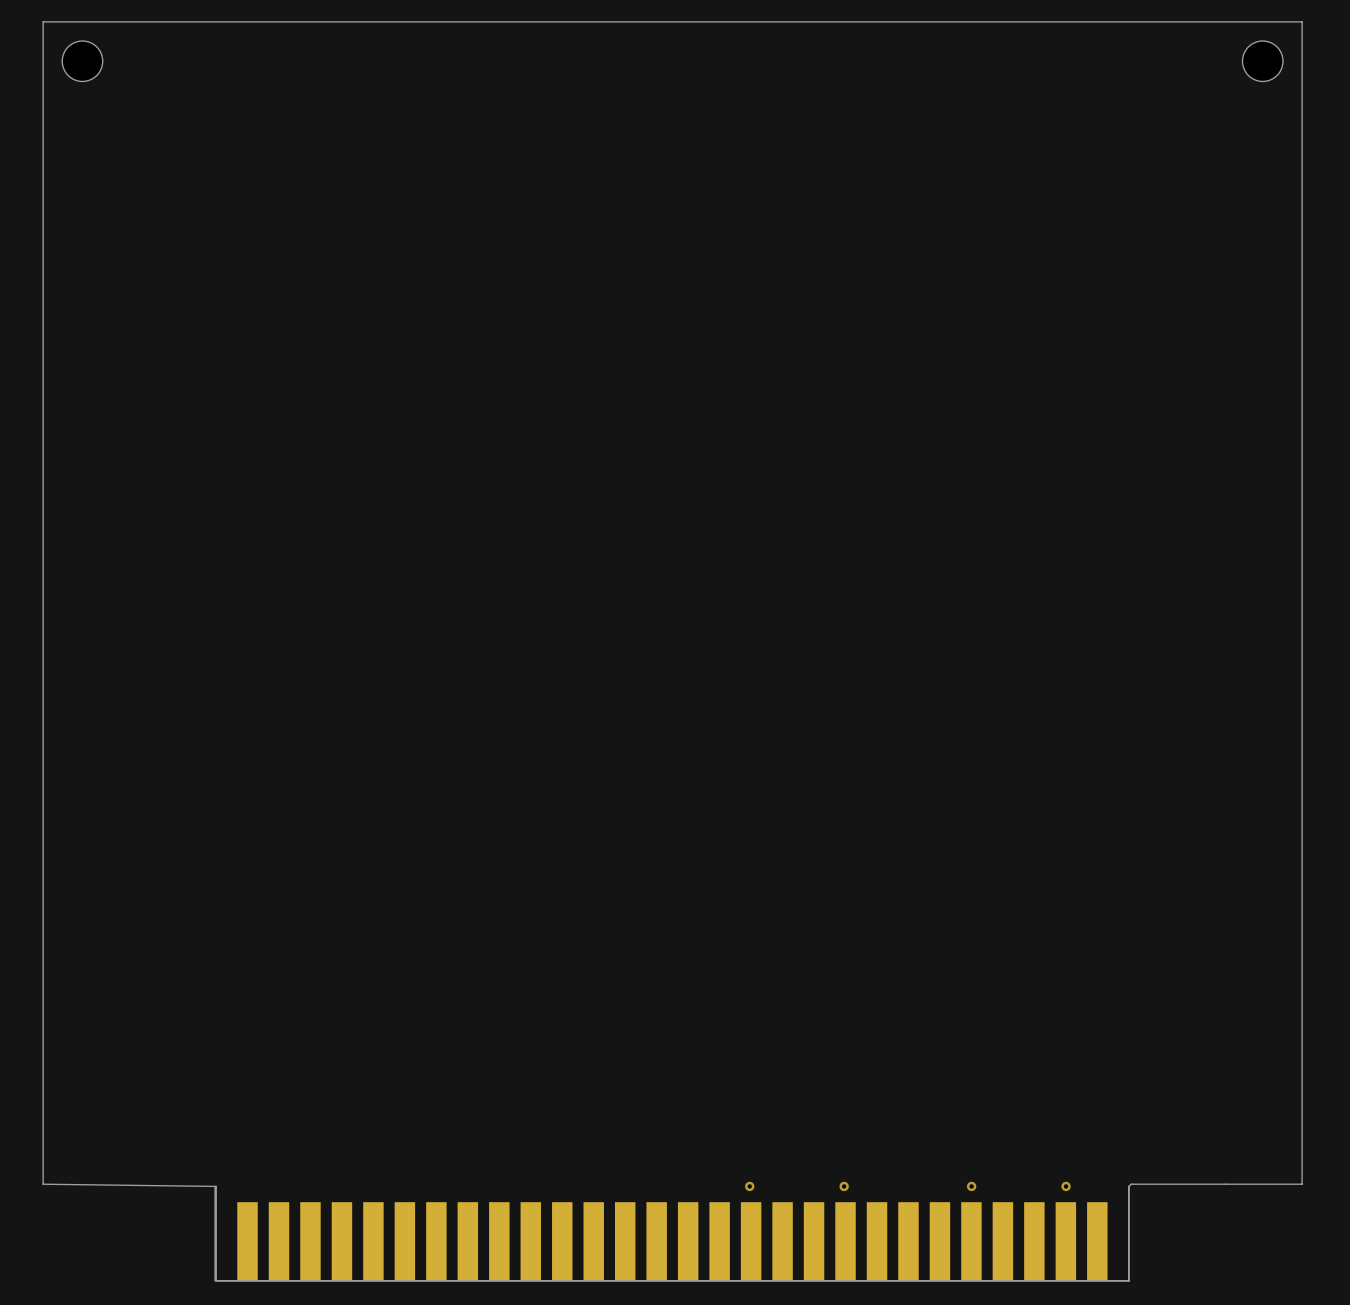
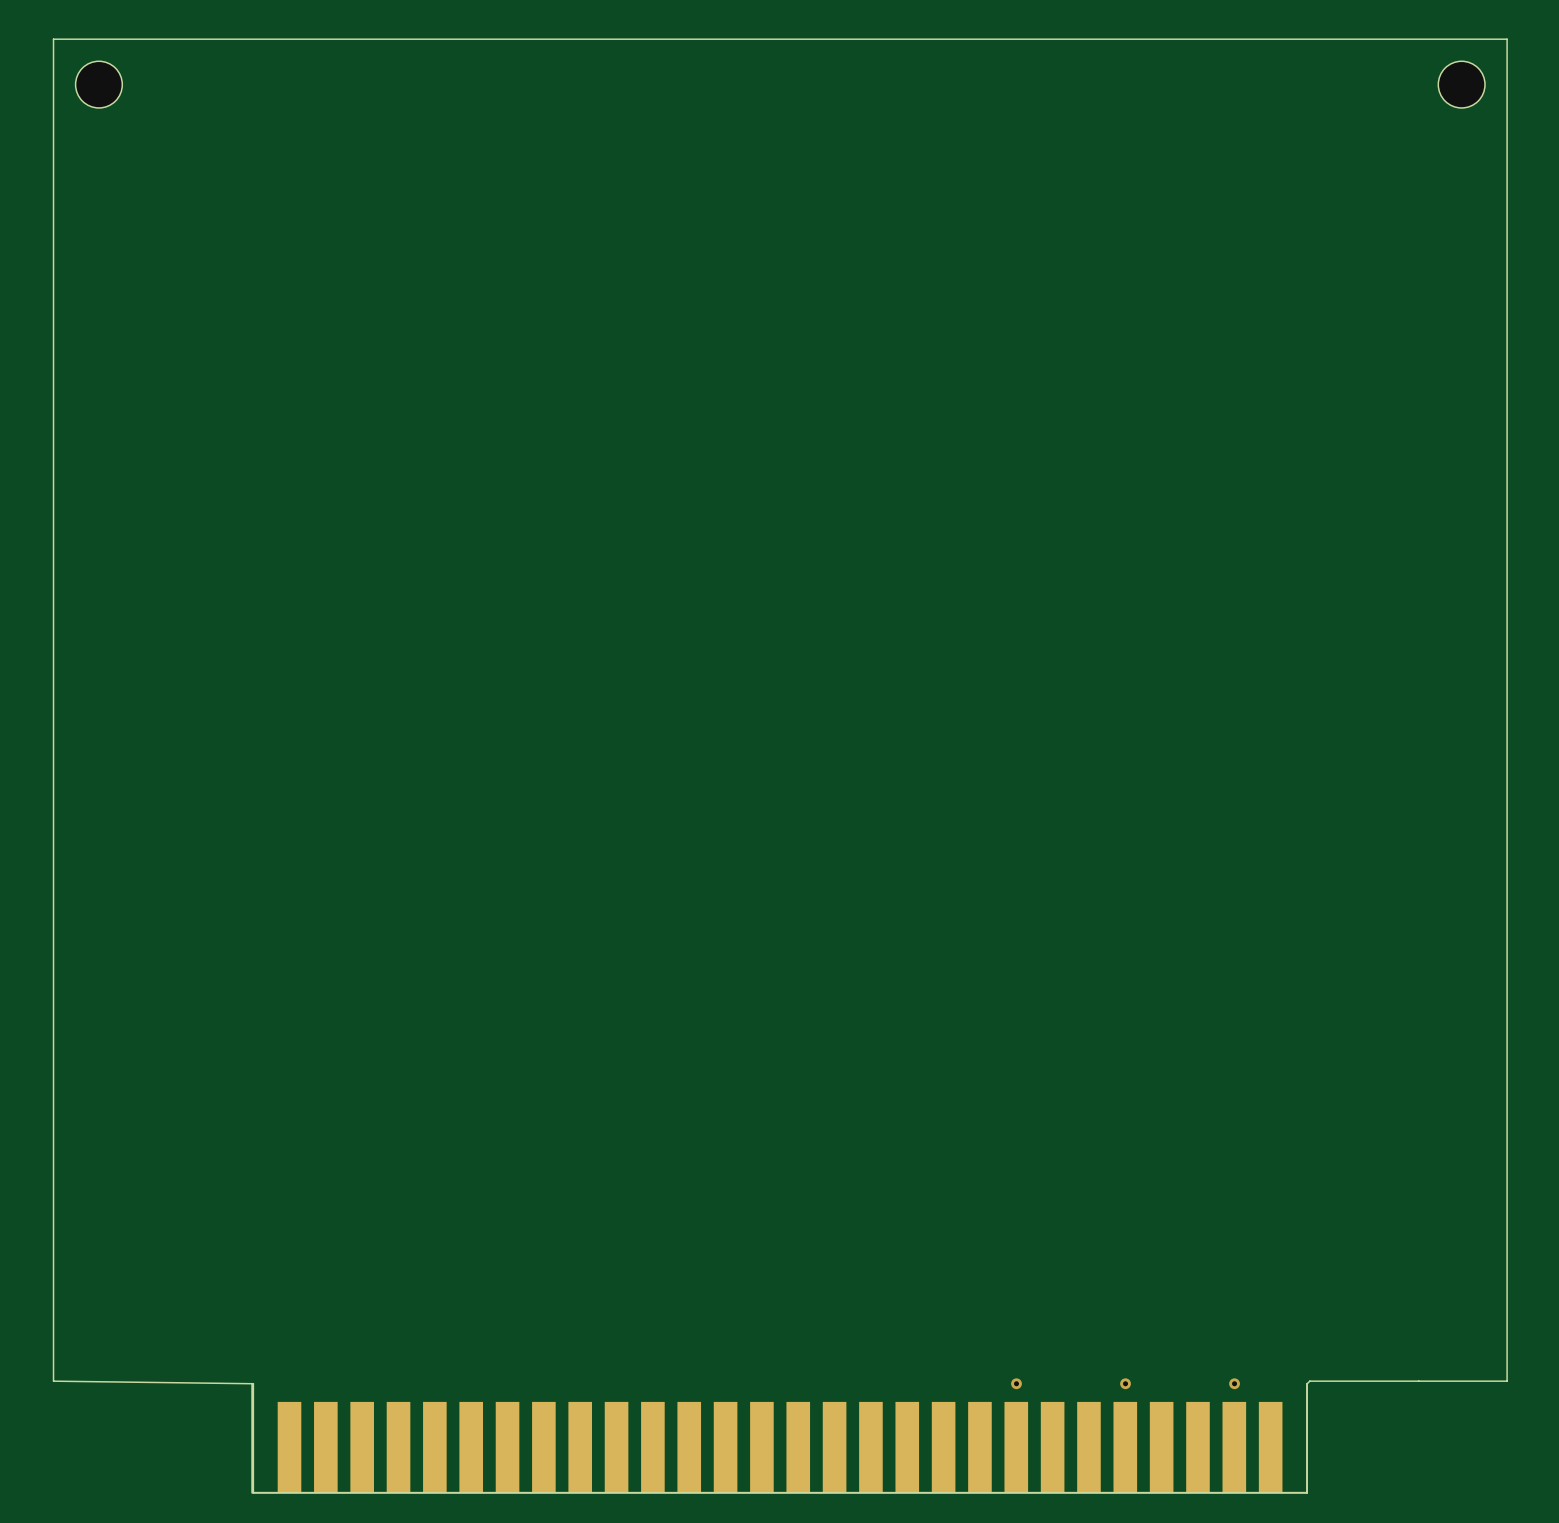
via: (749, 1186) -> none
via position: (844, 1186) -> (1016, 1383)

